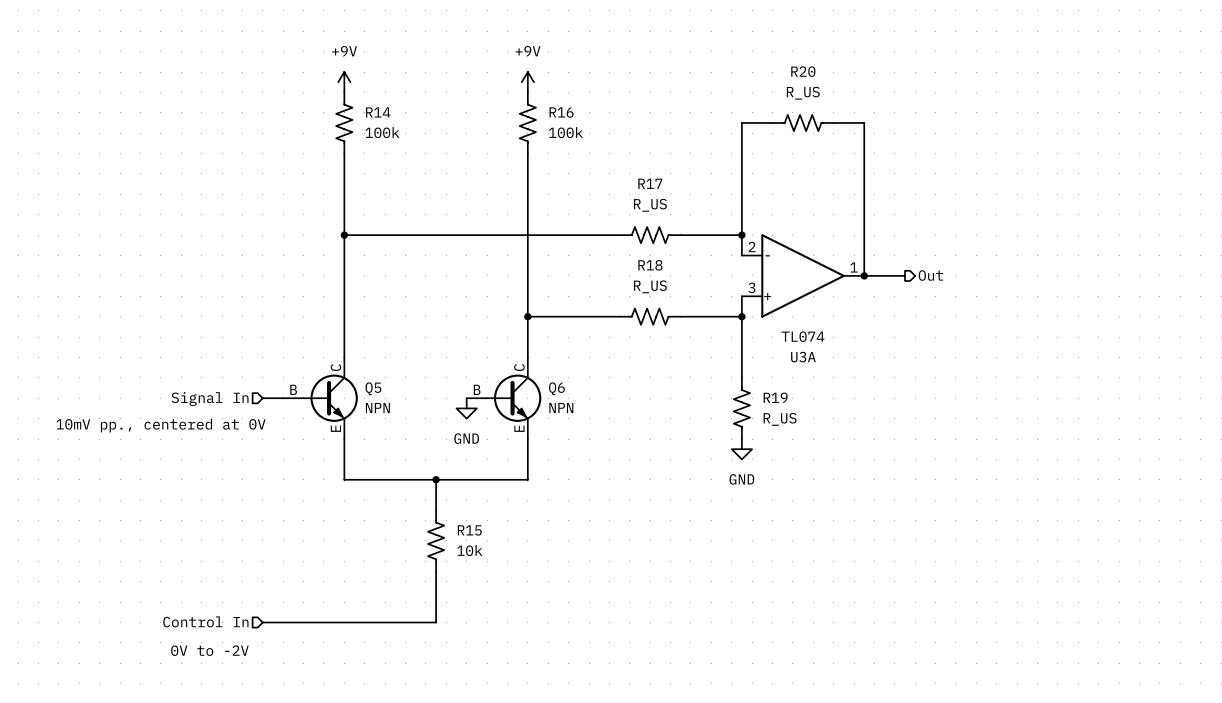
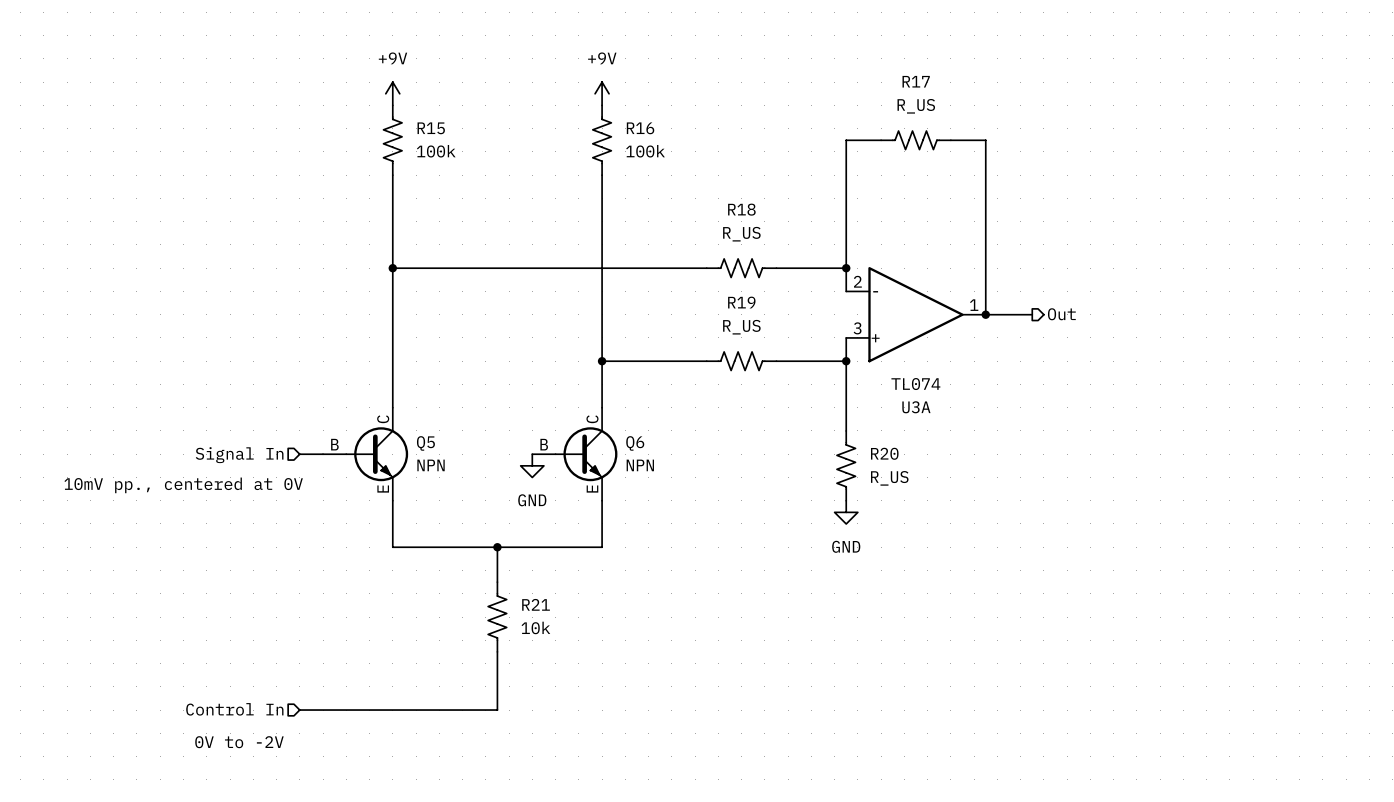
R20 name: R20 (803, 71) -> R17 (916, 81)
R14 name: R14 (378, 112) -> R15 (431, 128)
R17 name: R17 (650, 183) -> R18 (741, 209)
R18 name: R18 (650, 265) -> R19 (741, 302)
R19 name: R19 (775, 397) -> R20 (884, 453)
R15 name: R15 (469, 530) -> R21 (536, 604)

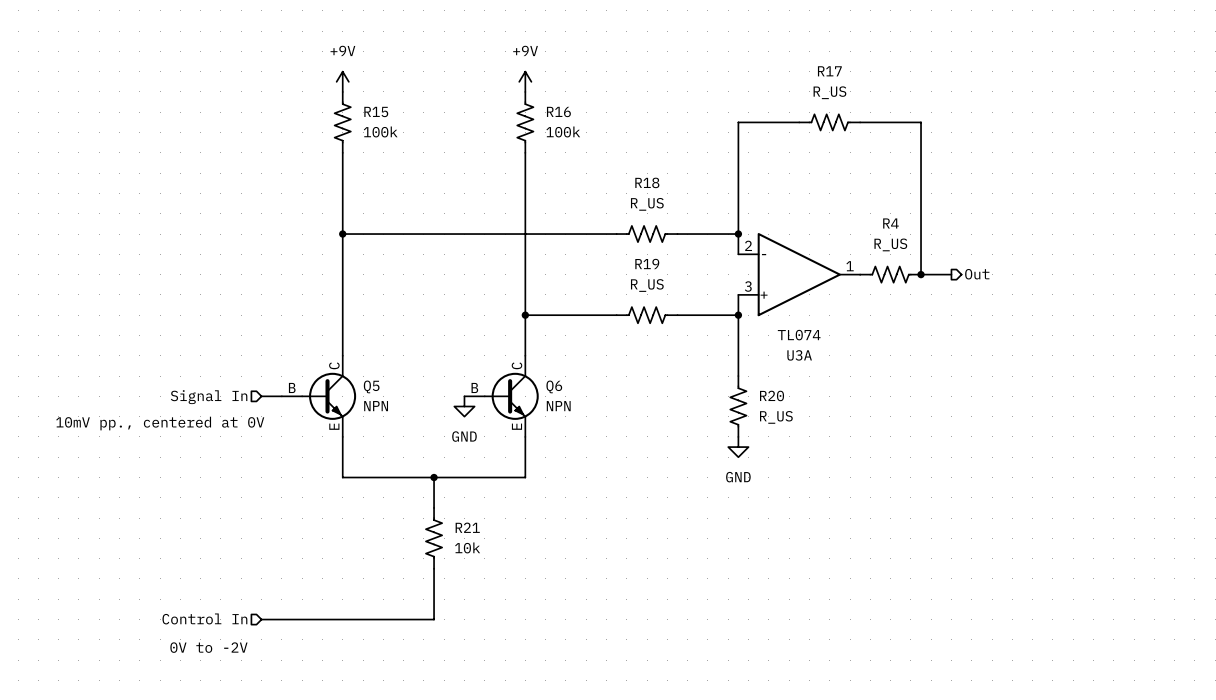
R17 position: (915, 140) -> (829, 122)
wire: (950, 140) (985, 140) (985, 314) (1032, 314) -> none
wire: none -> (860, 122) (921, 122) (921, 274) (951, 274)
junction: (985, 314) -> none
R4: none -> R_US (890, 274)
junction: none -> (921, 274)
hierarchical label position: Out (1061, 314) -> Out (977, 274)

